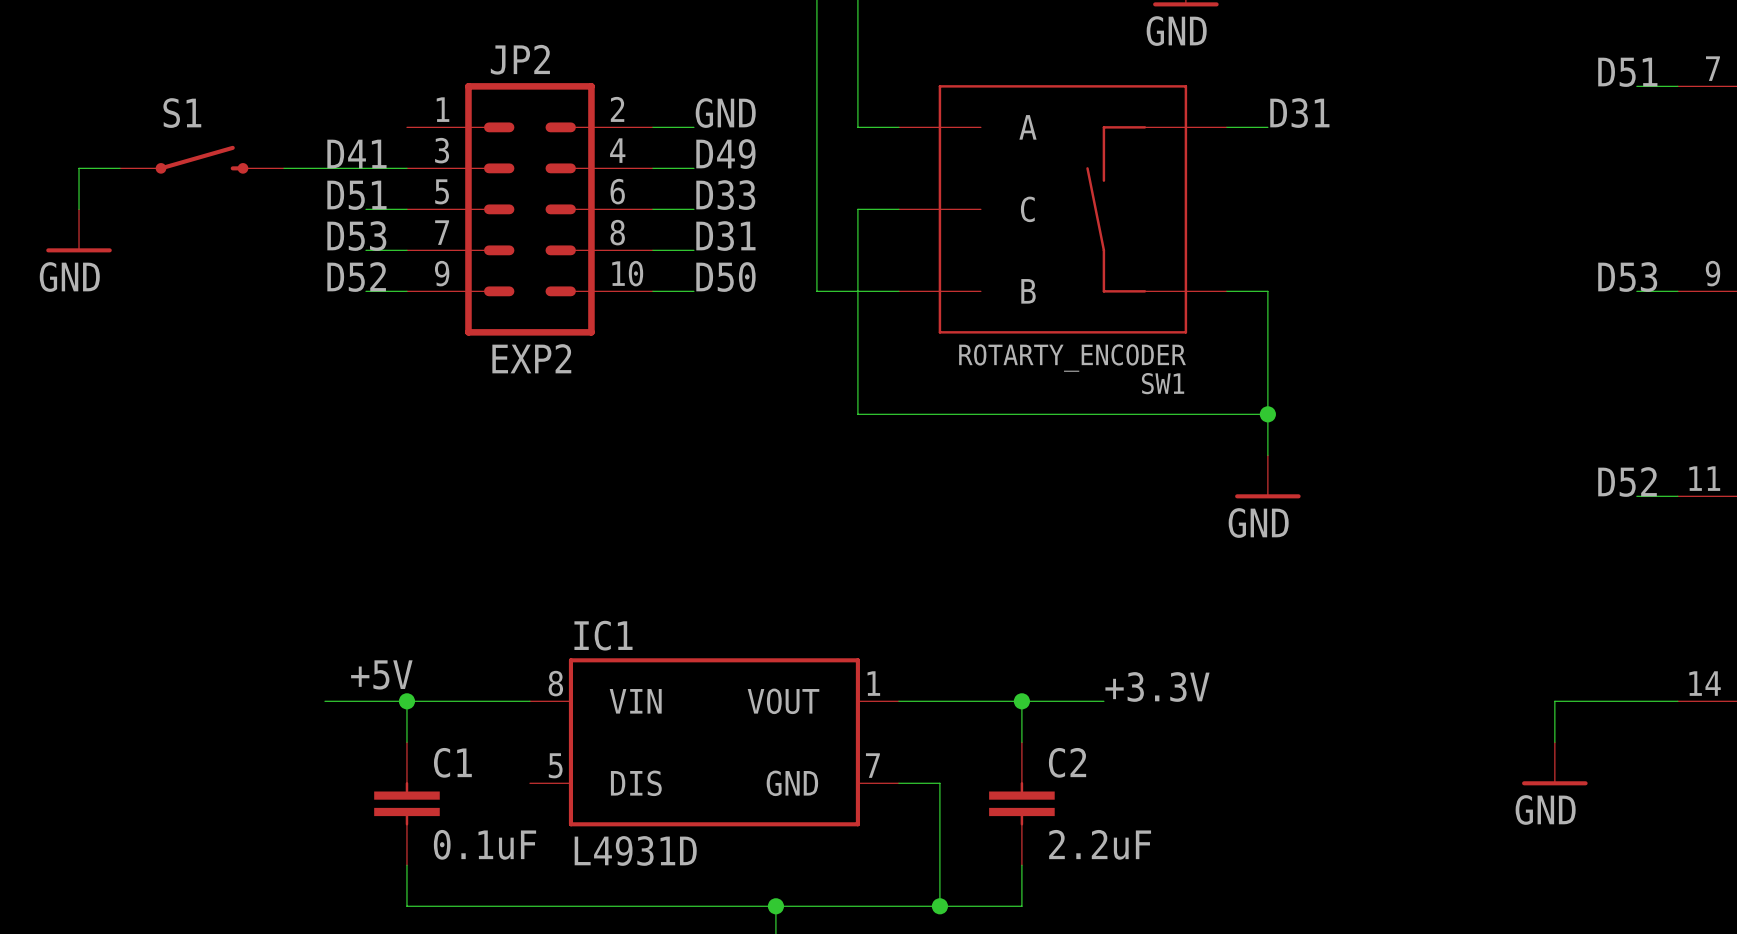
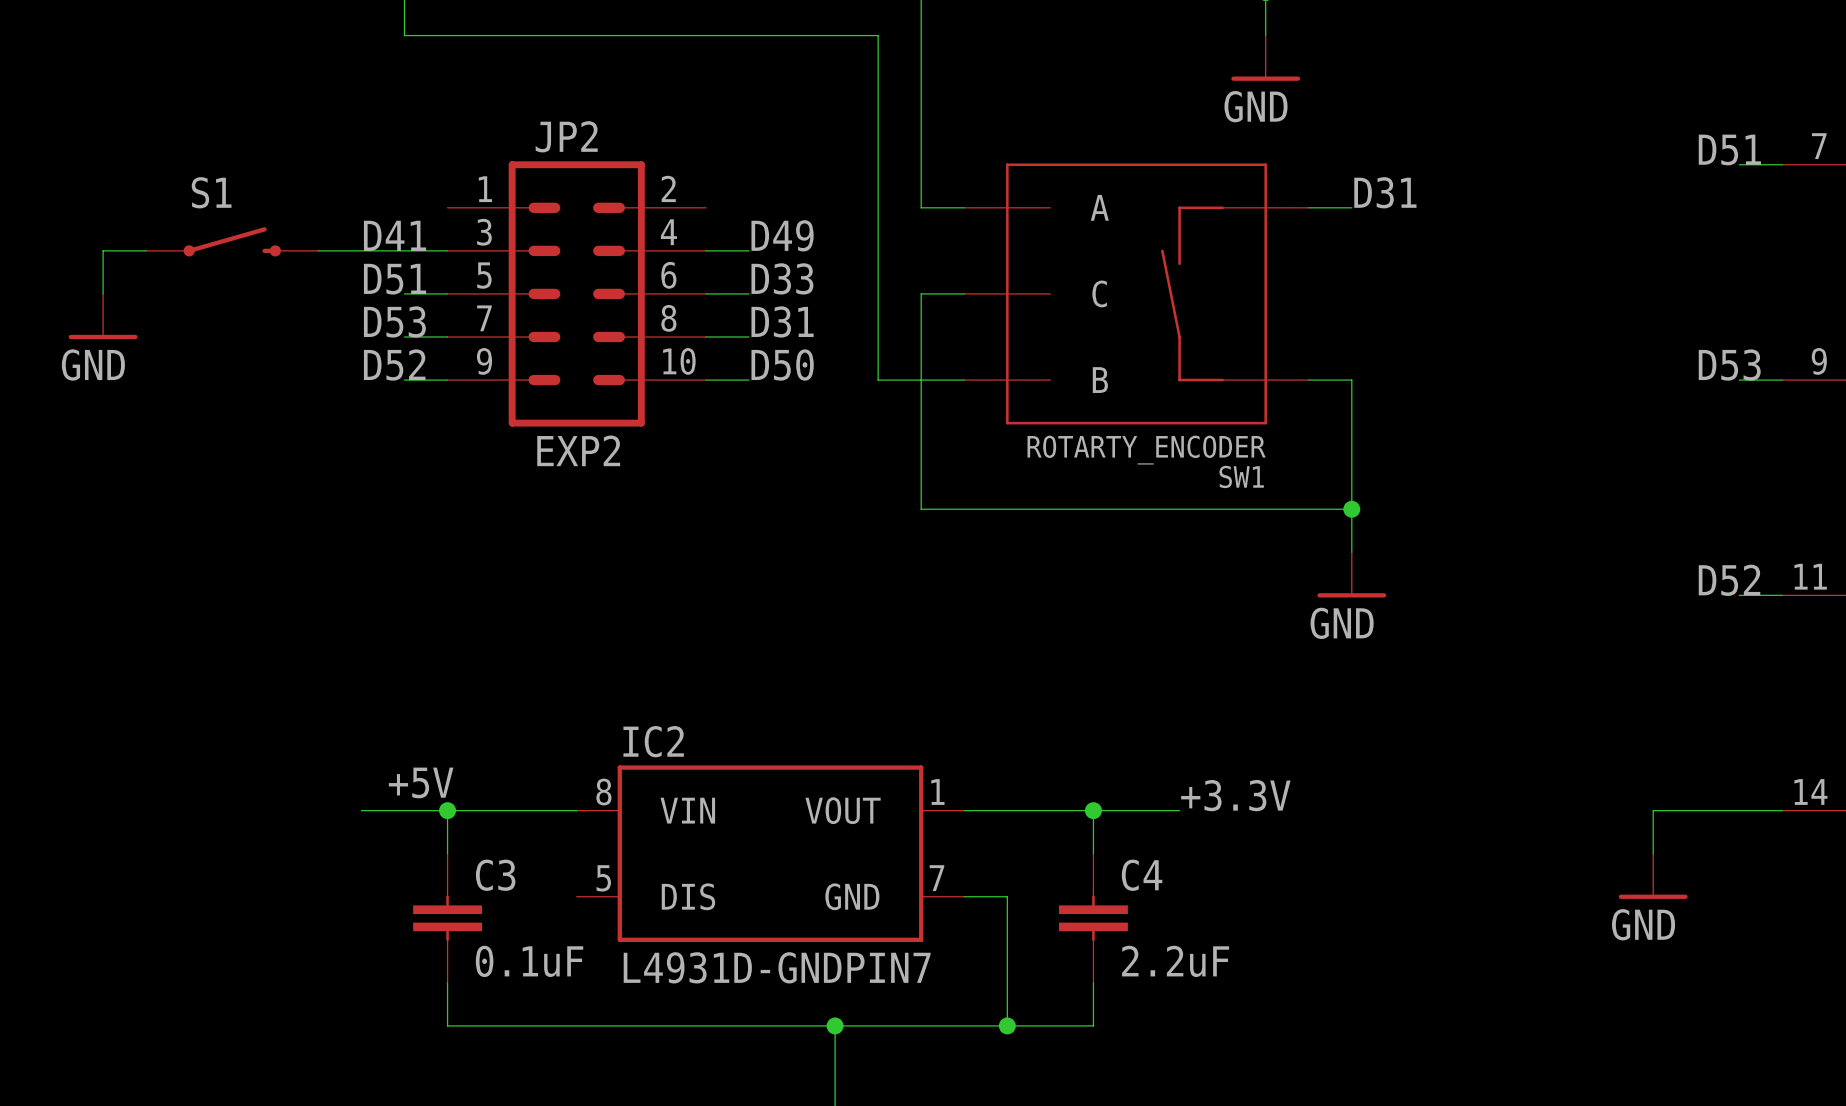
label: GND (725, 113) -> none
wire: (652, 127) (693, 127) -> none
IC1 name: IC1 (603, 635) -> IC2 (653, 741)
C1 name: C1 (452, 762) -> C3 (495, 875)
C2 name: C2 (1067, 762) -> C4 (1142, 875)
IC1 value: L4931D (635, 850) -> L4931D-GNDPIN7 (777, 967)

